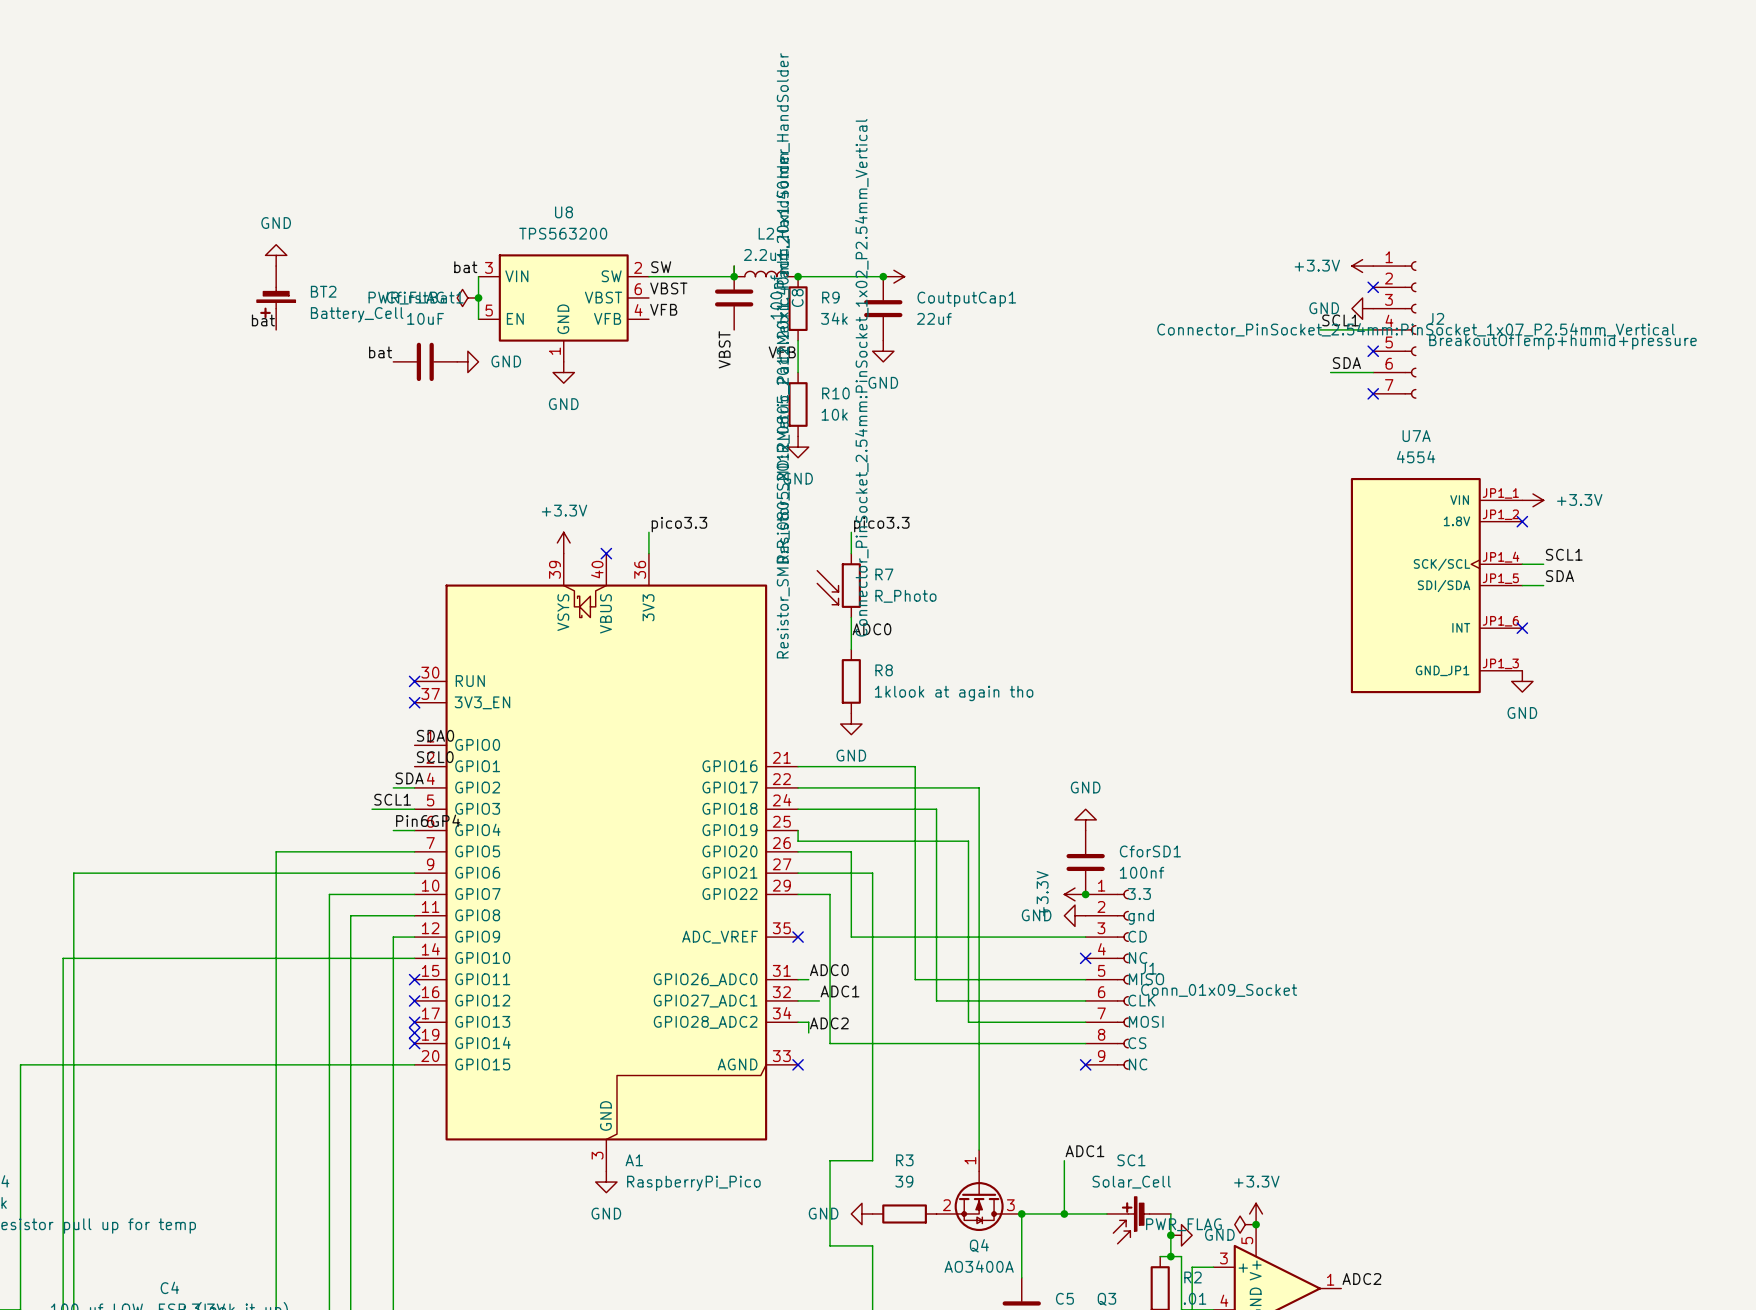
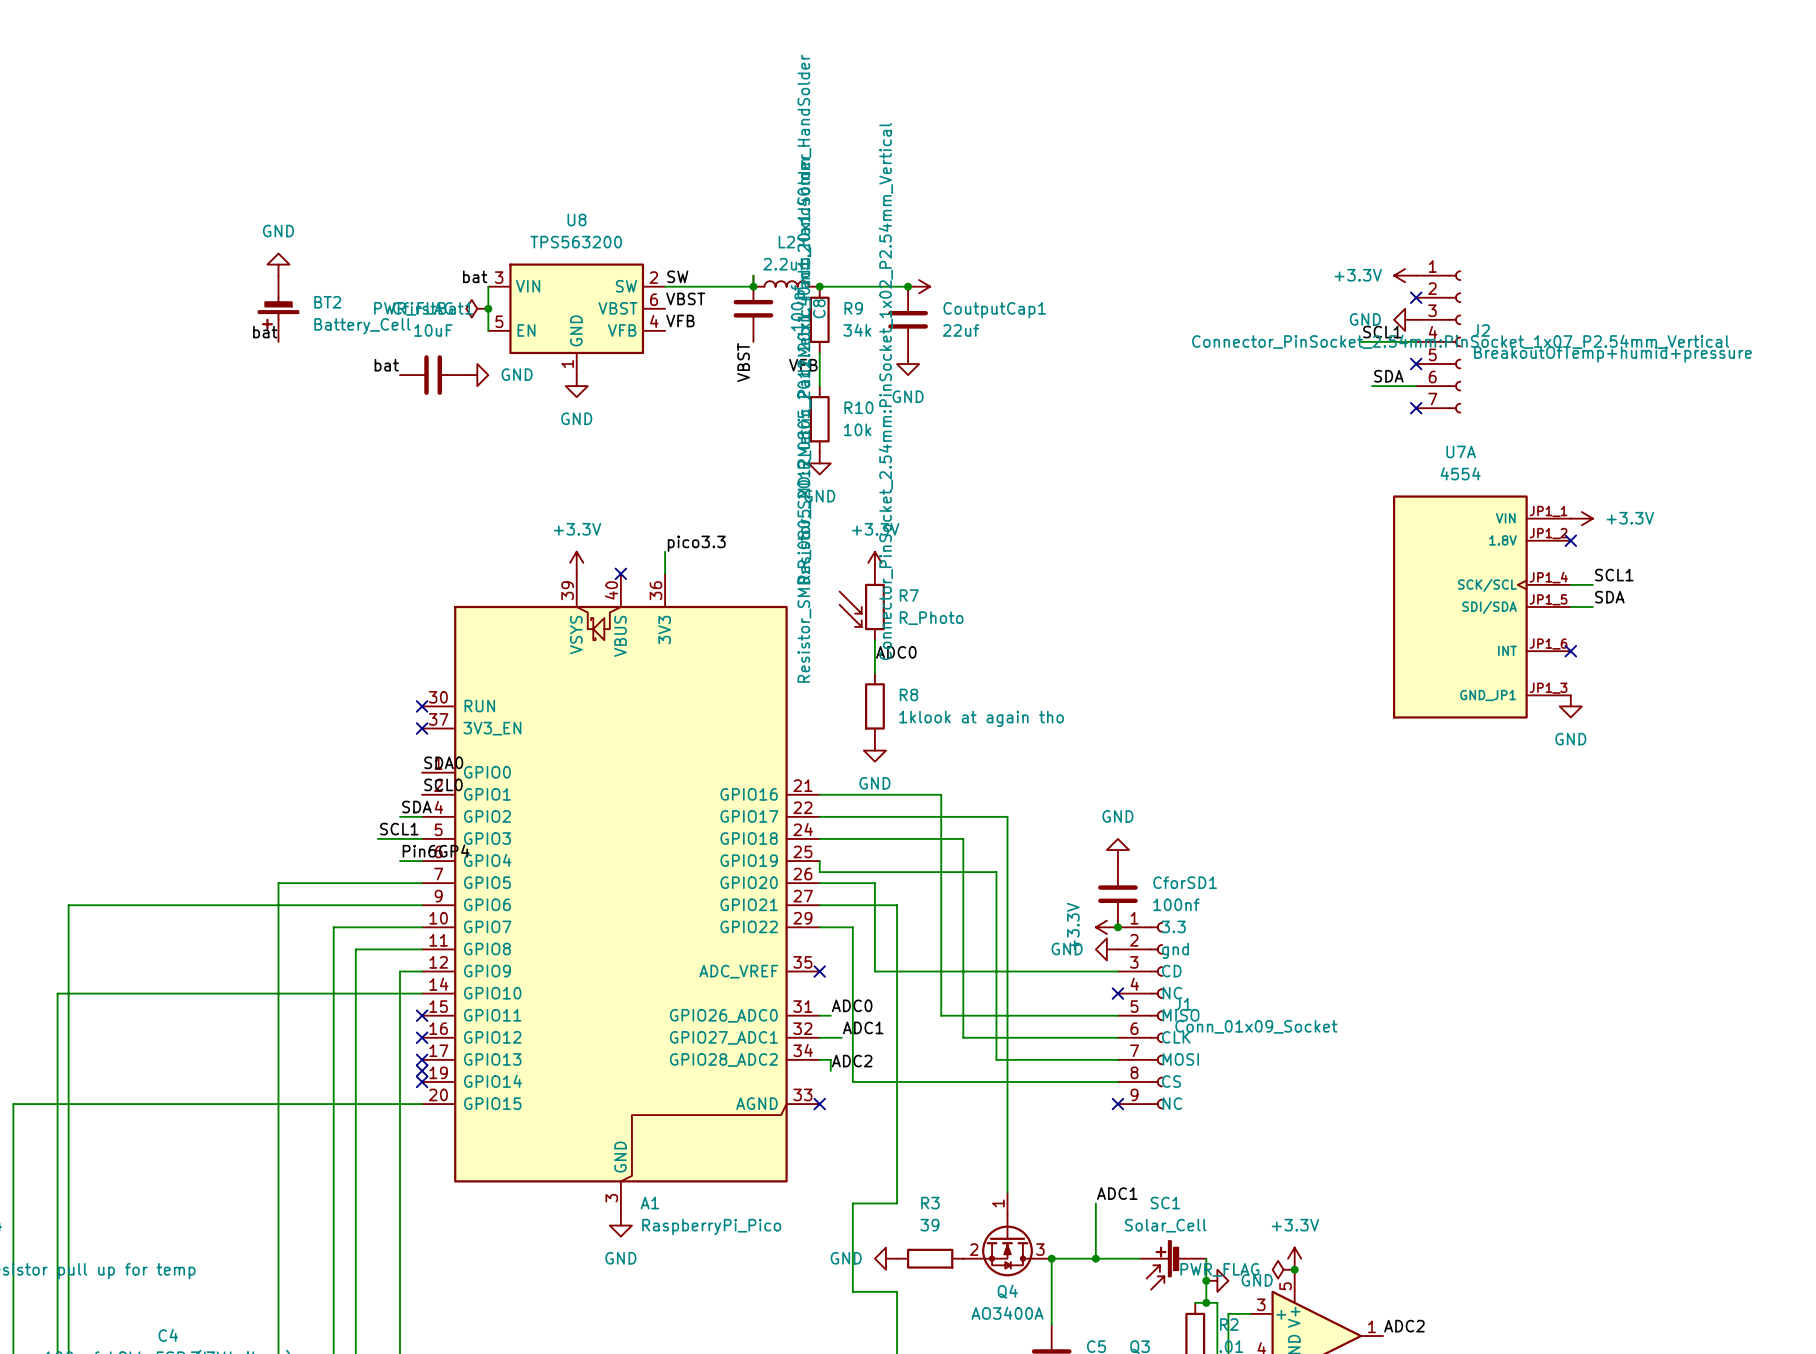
label: pico3.3 (881, 524) -> none
power symbol: none -> +3.3V (874, 562)

